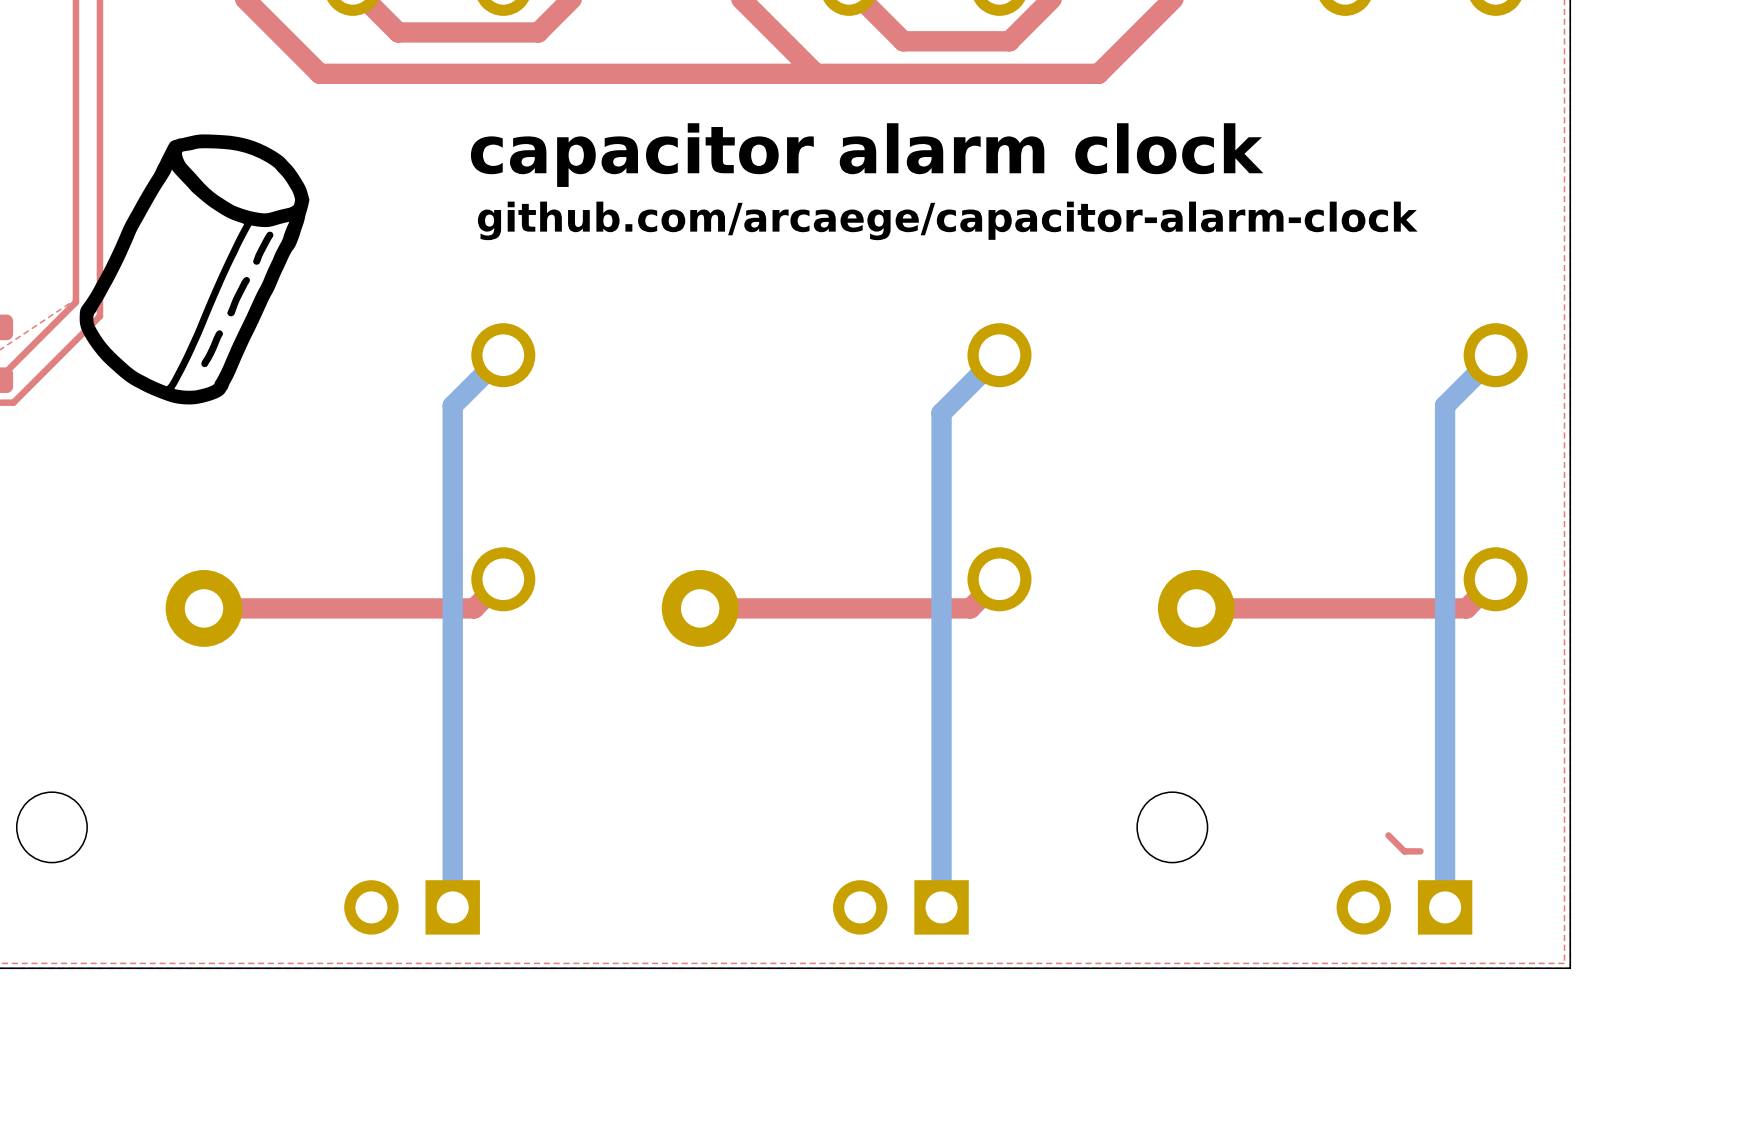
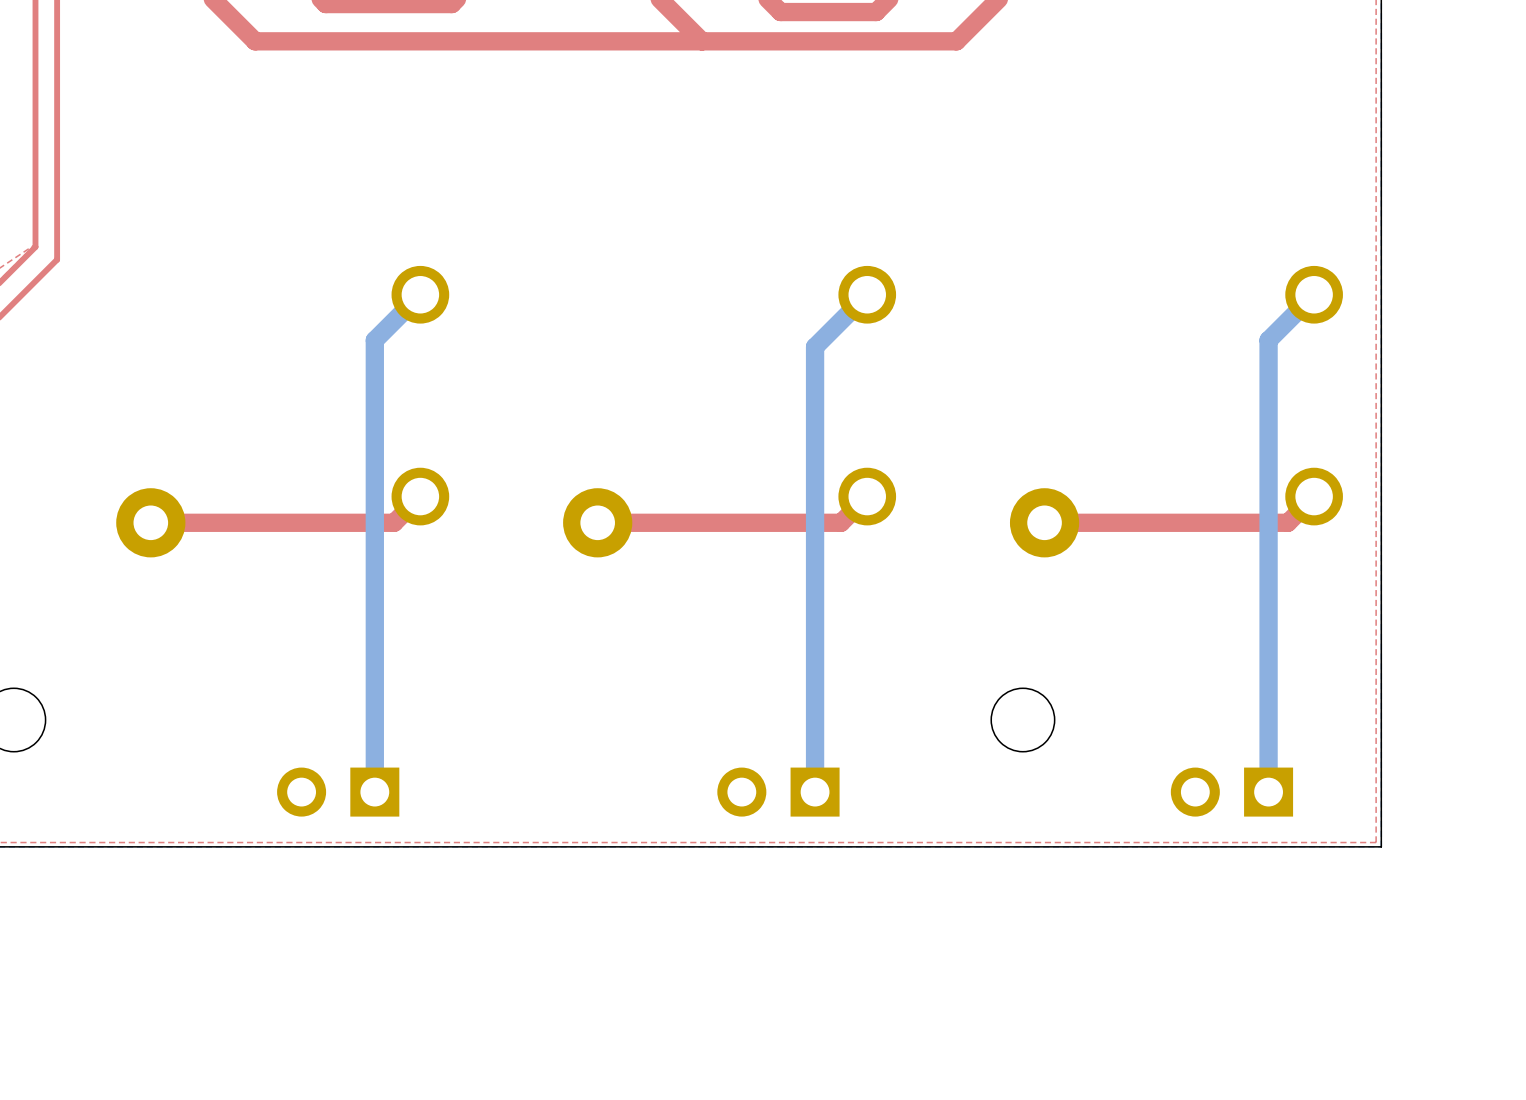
drawing: [79, 134, 310, 405] -> none
text: capacitor alarm clock (867, 155) -> none
text: github.com/arcaege/capacitor-alarm-clock (947, 220) -> none
top track: (1388, 835) (1404, 851) (1420, 851) -> none

